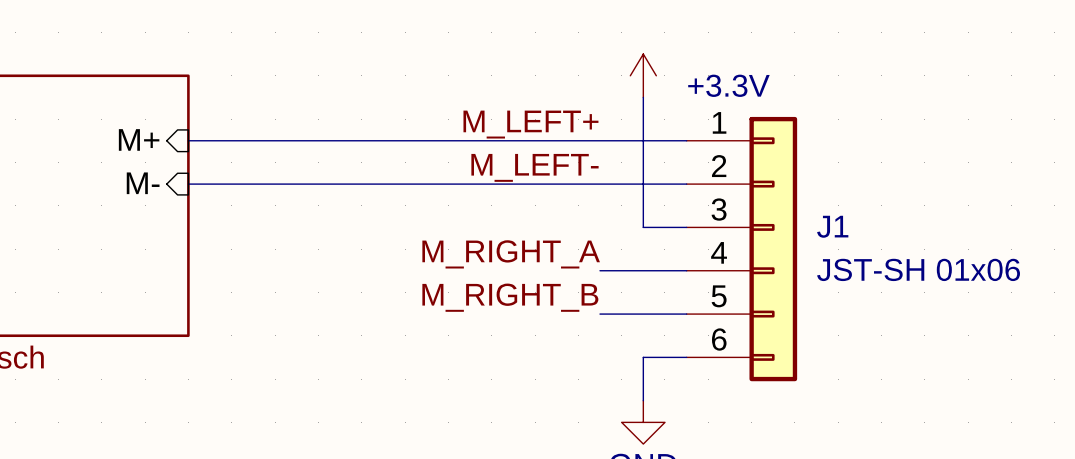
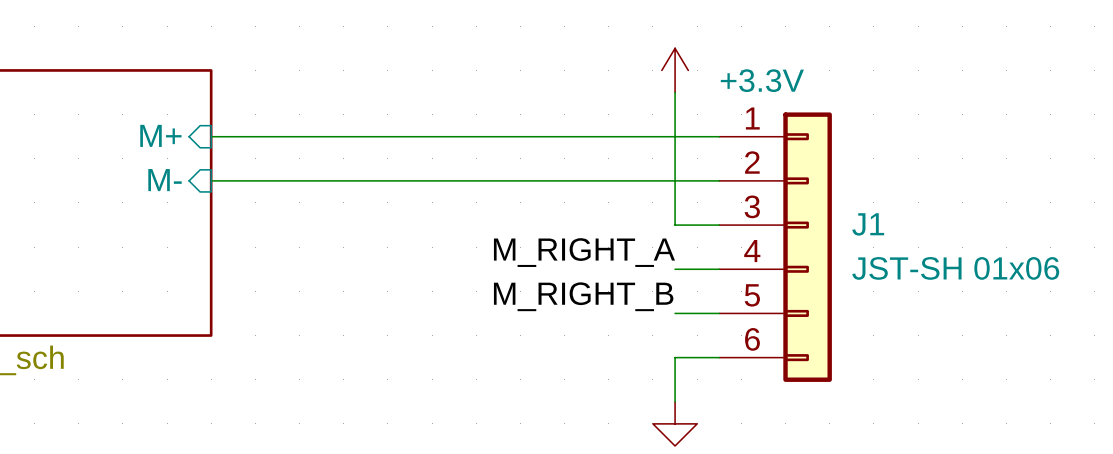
label: M_LEFT+ (530, 124) -> none
label: M_LEFT- (534, 167) -> none
label position: M_RIGHT_A (511, 254) -> M_RIGHT_A (584, 252)
wire: (600, 270) (643, 270) -> none
label position: M_RIGHT_B (510, 297) -> M_RIGHT_B (583, 296)
wire: (600, 314) (643, 314) -> none

